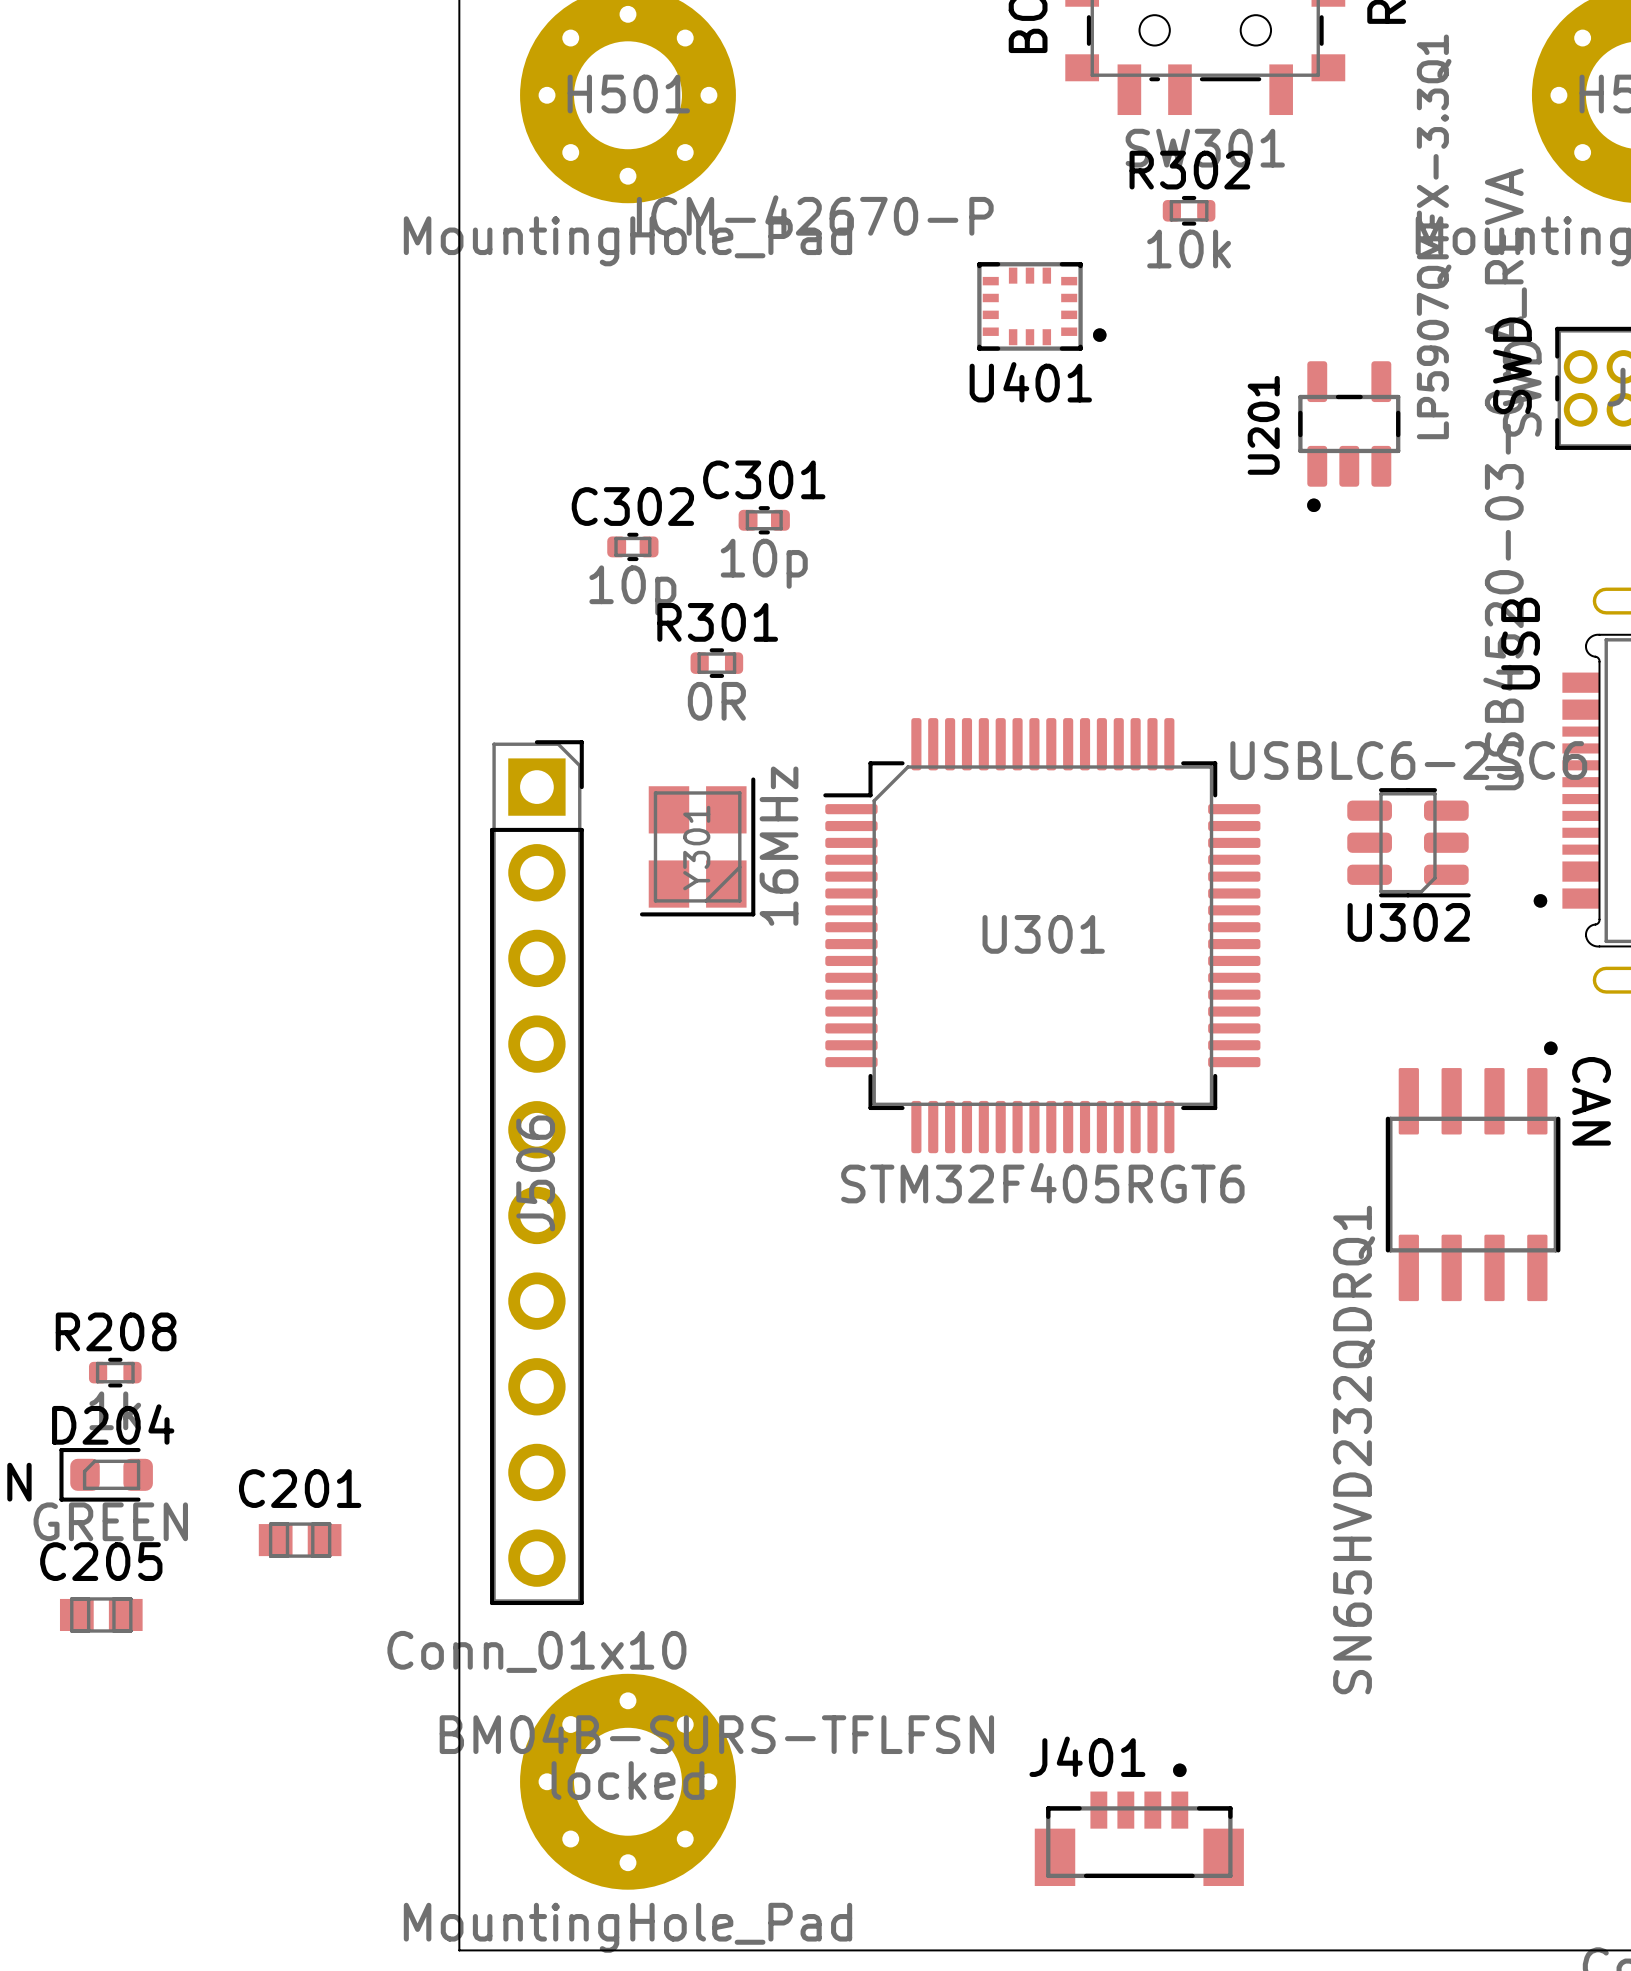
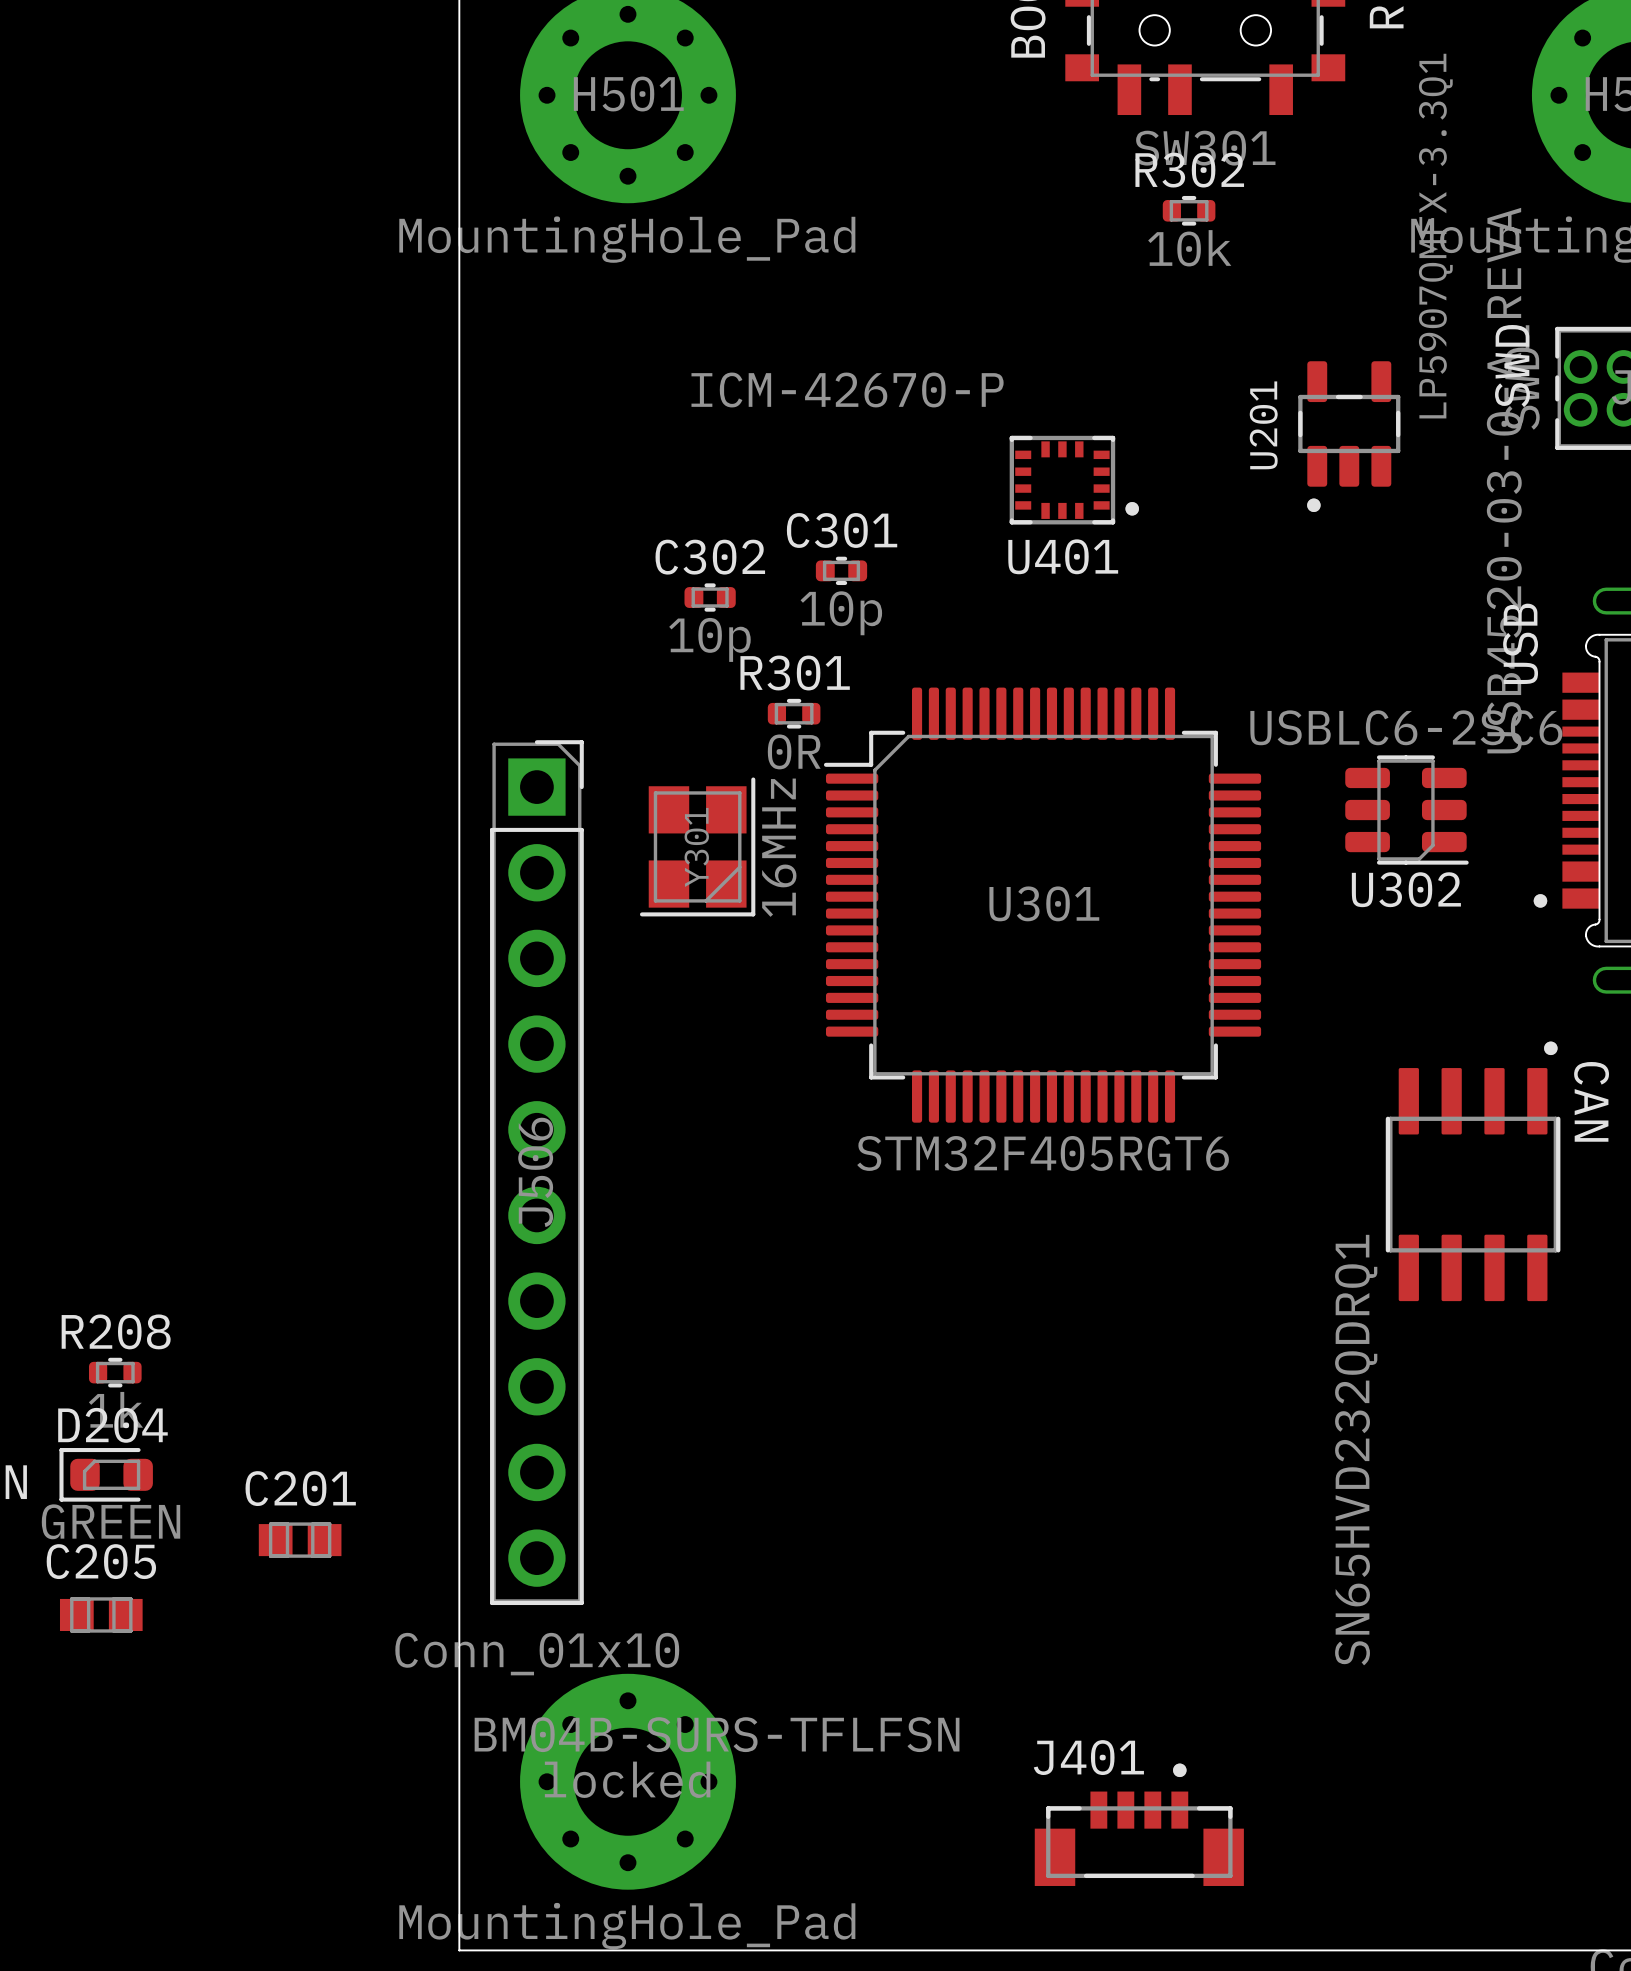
U401 position: (1041, 306) -> (1074, 480)
C301 position: (764, 520) -> (841, 570)
C302 position: (632, 546) -> (710, 597)
R301 position: (716, 663) -> (794, 713)
U302 position: (1409, 842) -> (1406, 810)
U301 position: (1041, 935) -> (1042, 905)

